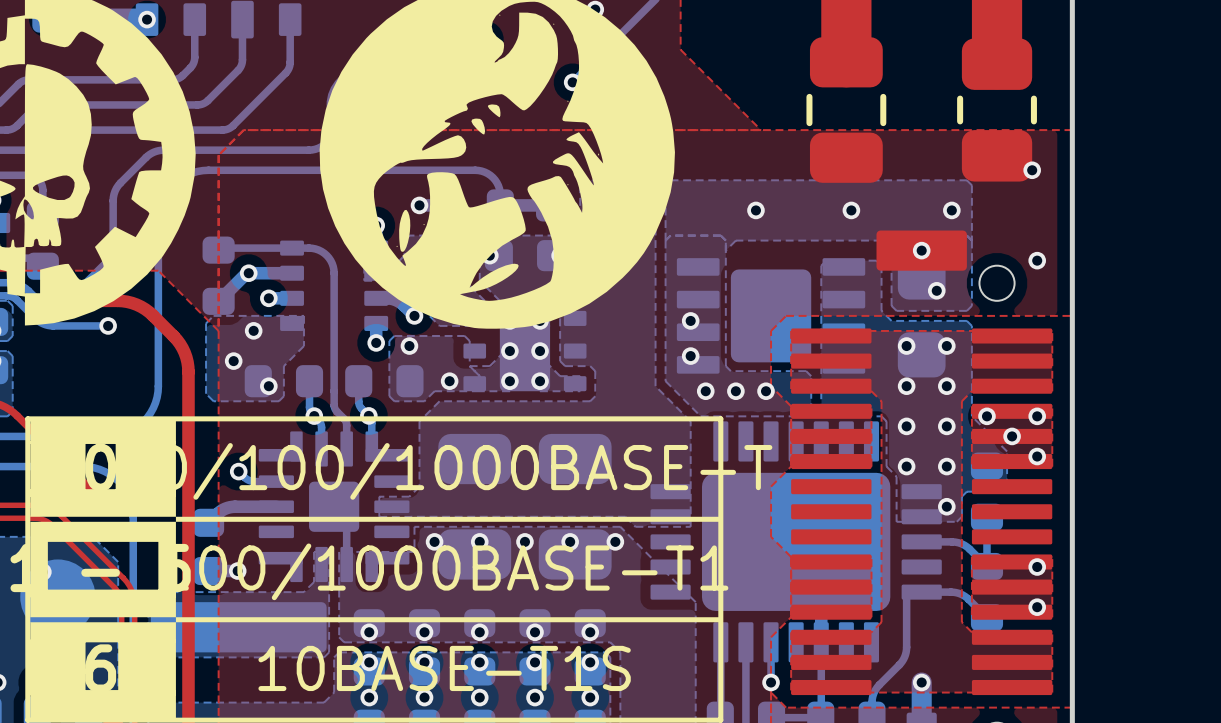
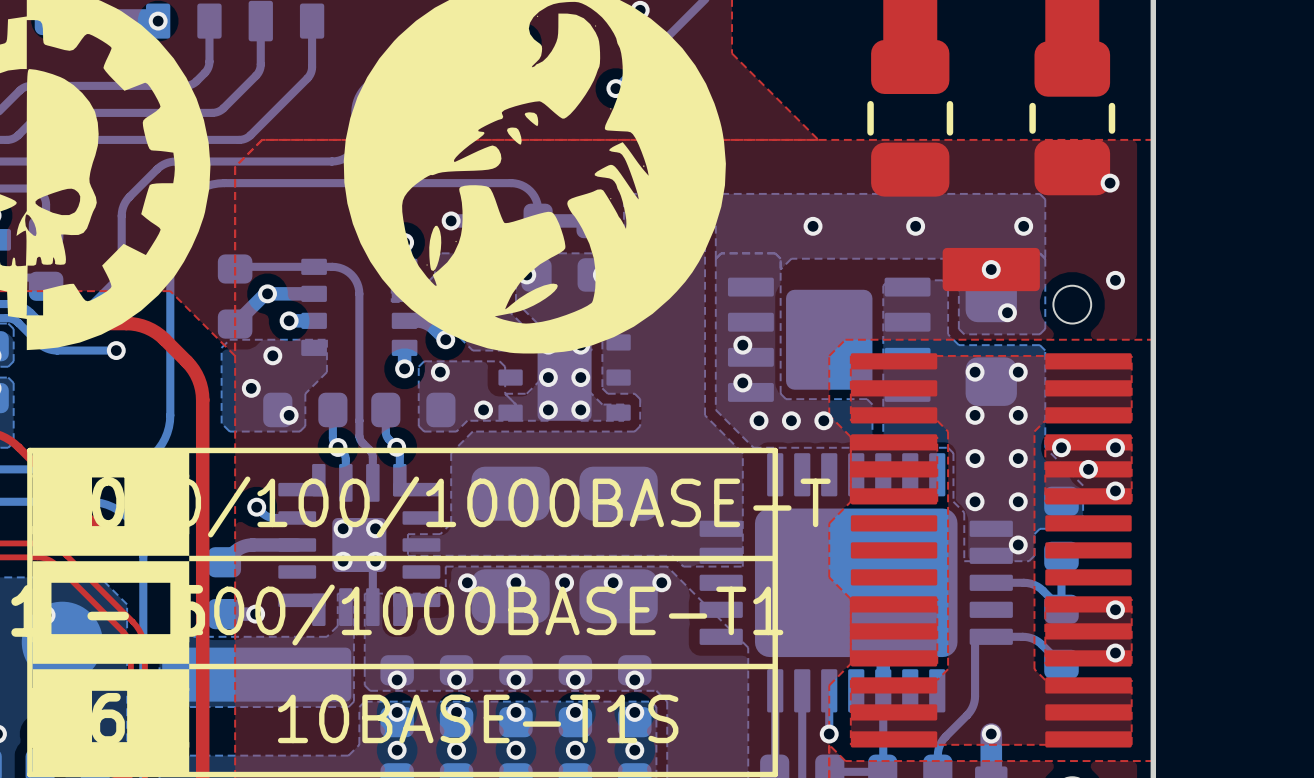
via: none -> (343, 528)
via: none -> (375, 528)
via: none -> (343, 561)
via: none -> (375, 561)

